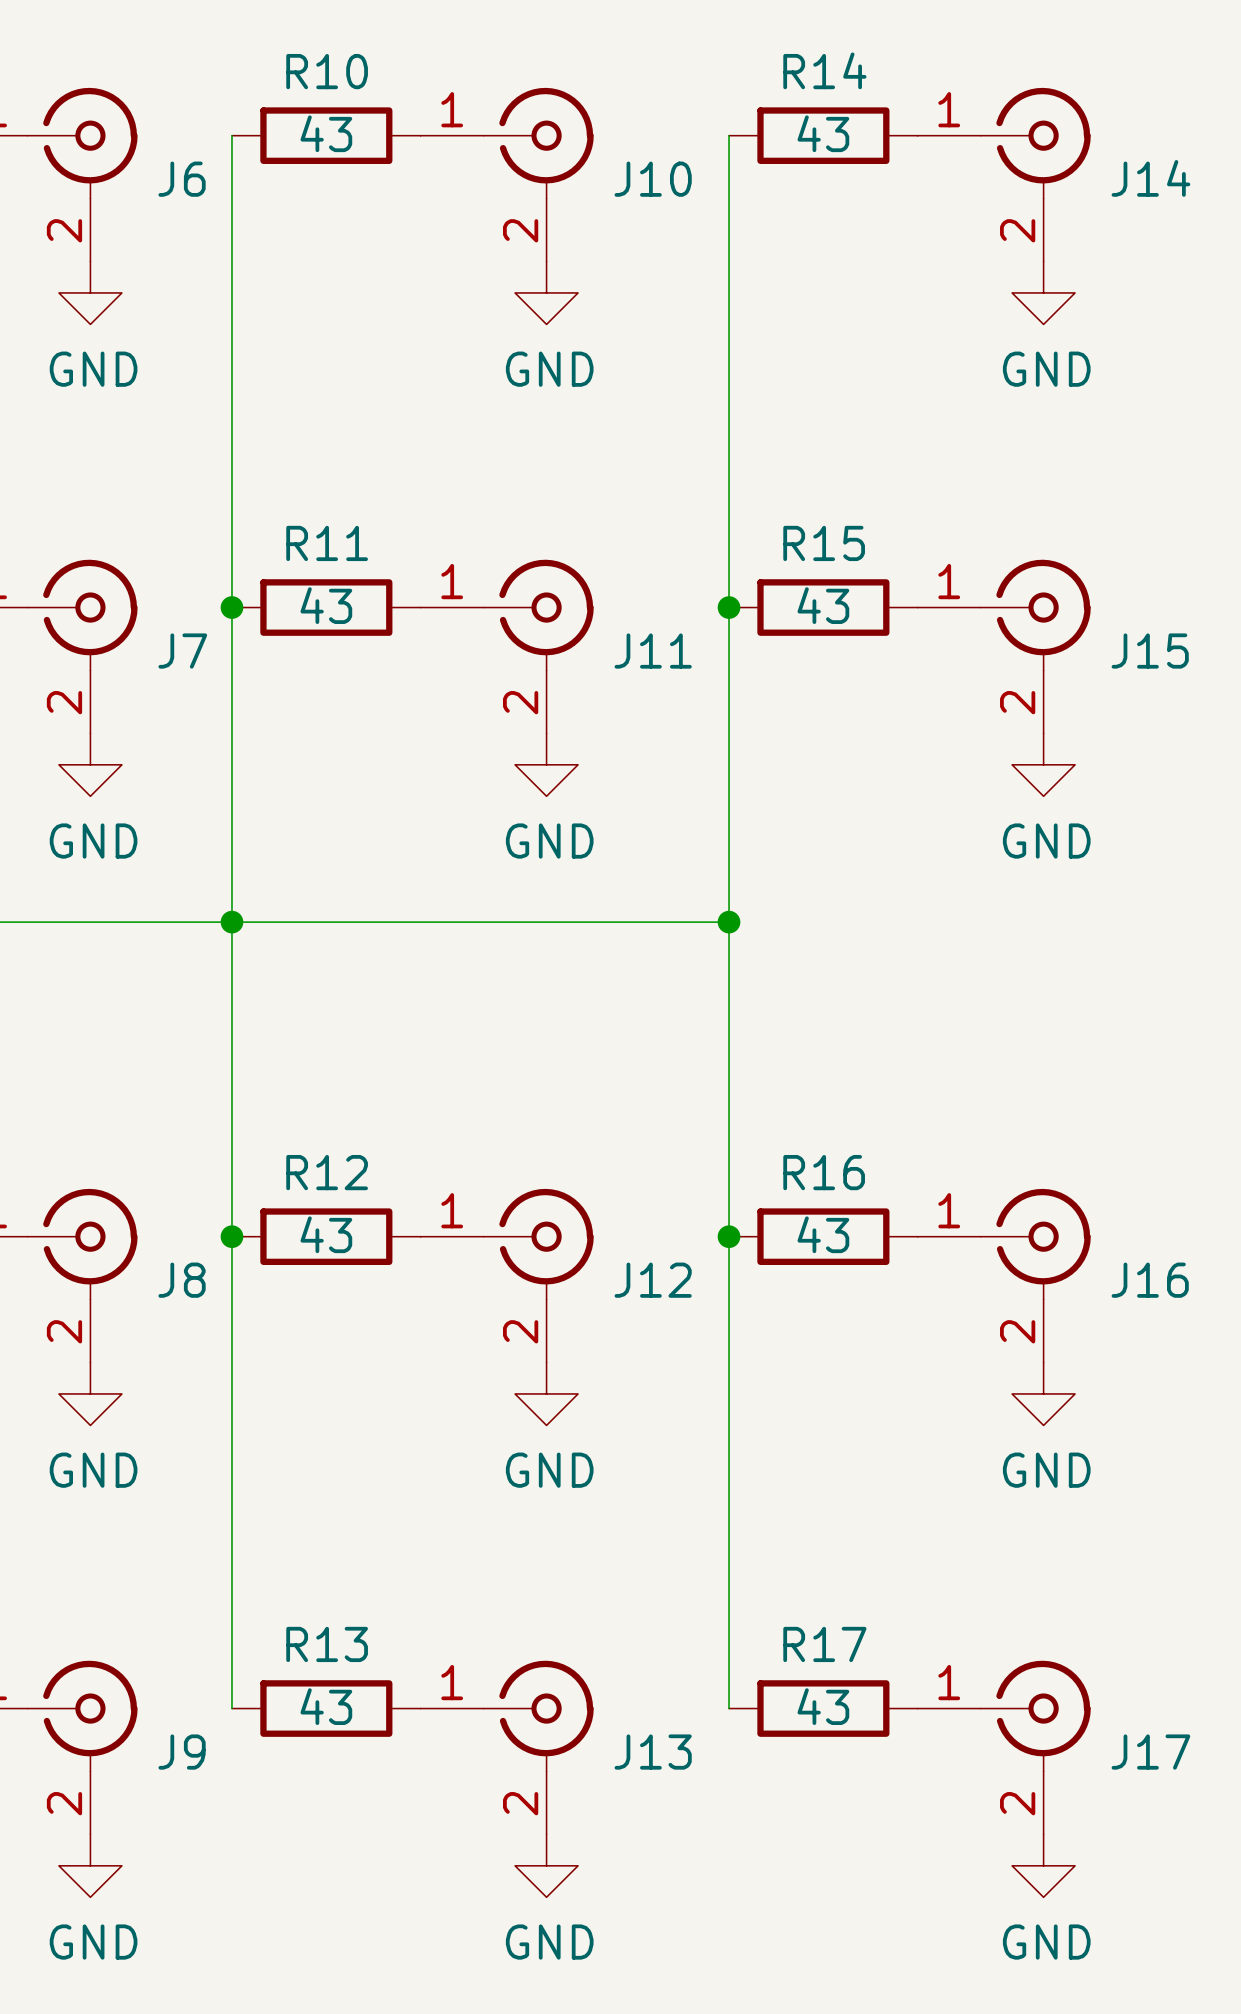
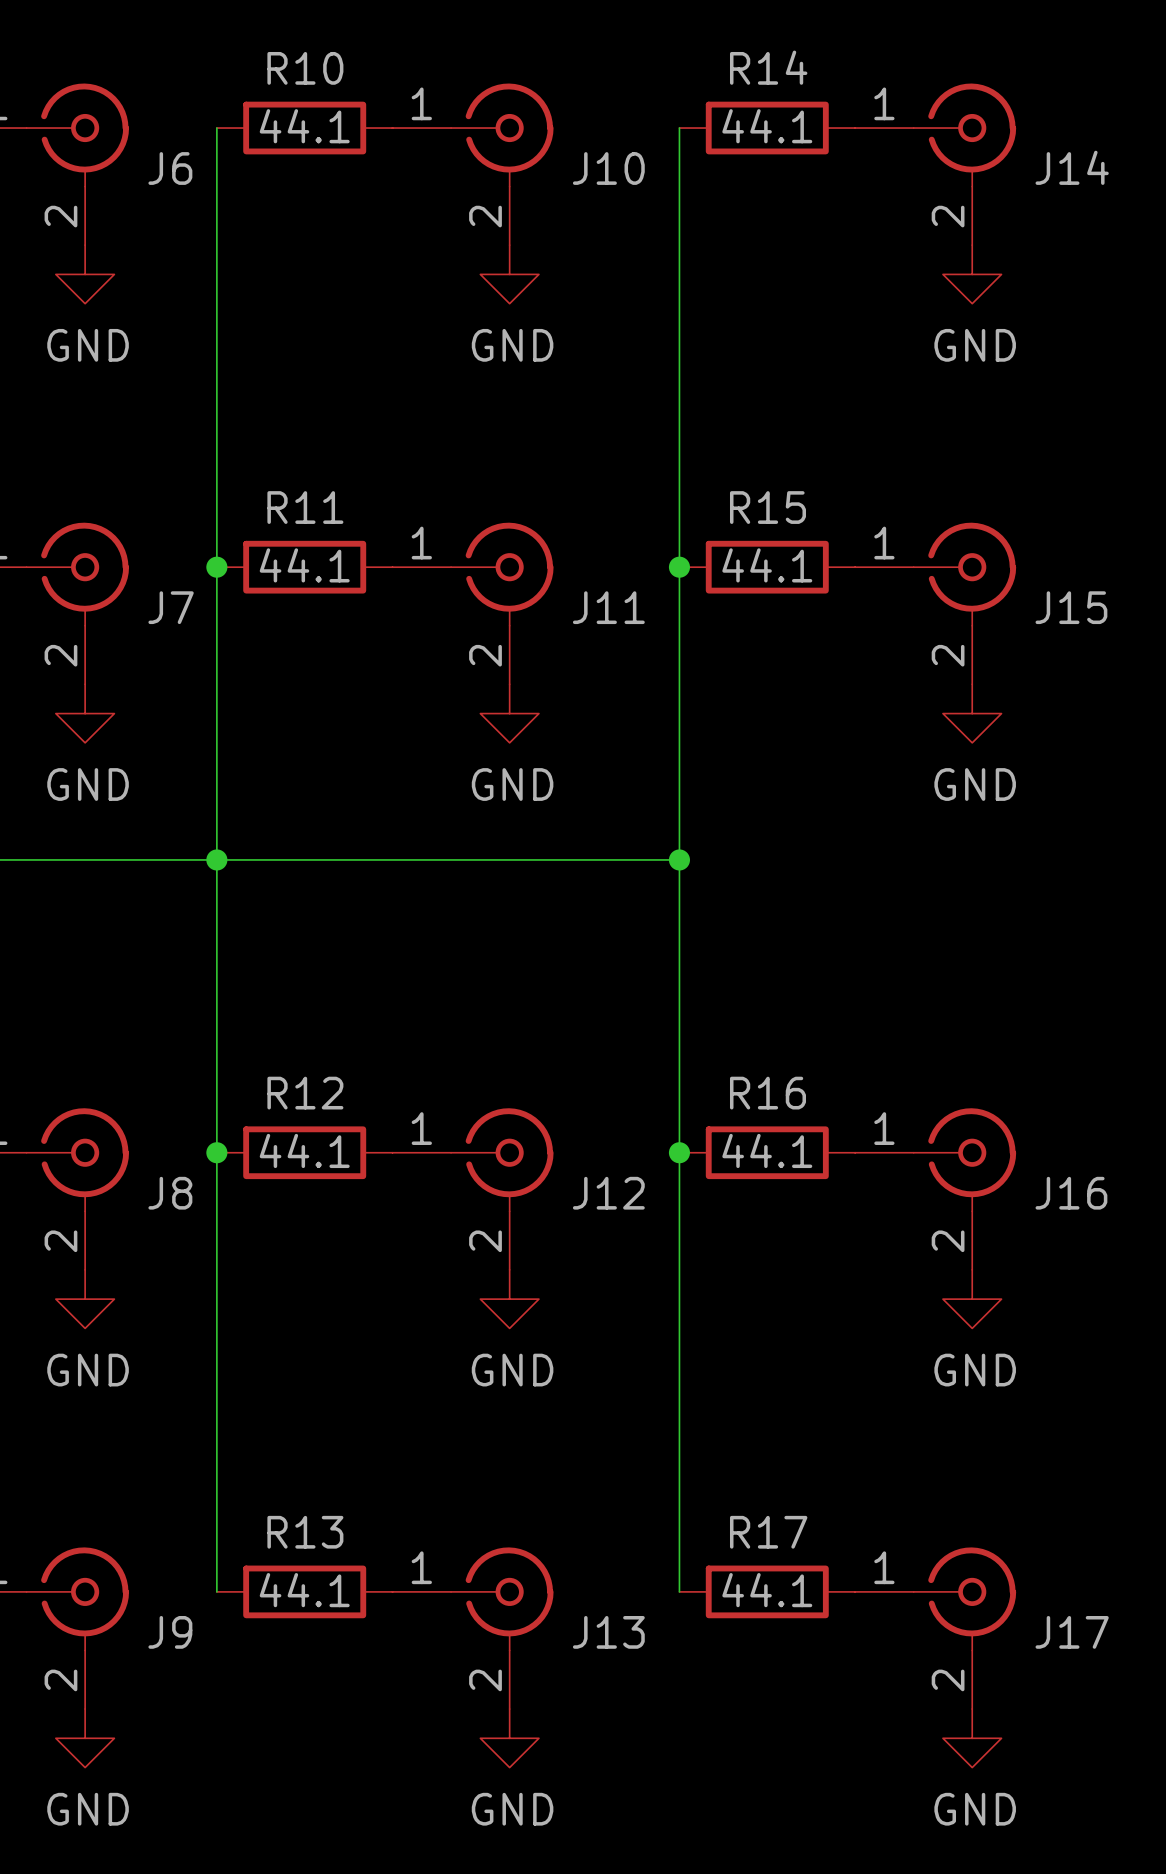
R10 value: 43 (326, 133) -> 44.1 (304, 126)
R14 value: 43 (823, 133) -> 44.1 (767, 126)
R11 value: 43 (326, 605) -> 44.1 (304, 565)
R15 value: 43 (823, 605) -> 44.1 (767, 565)
R12 value: 43 (326, 1234) -> 44.1 (304, 1150)
R16 value: 43 (823, 1234) -> 44.1 (767, 1150)
R13 value: 43 (326, 1706) -> 44.1 (304, 1590)
R17 value: 43 (823, 1706) -> 44.1 (767, 1590)

